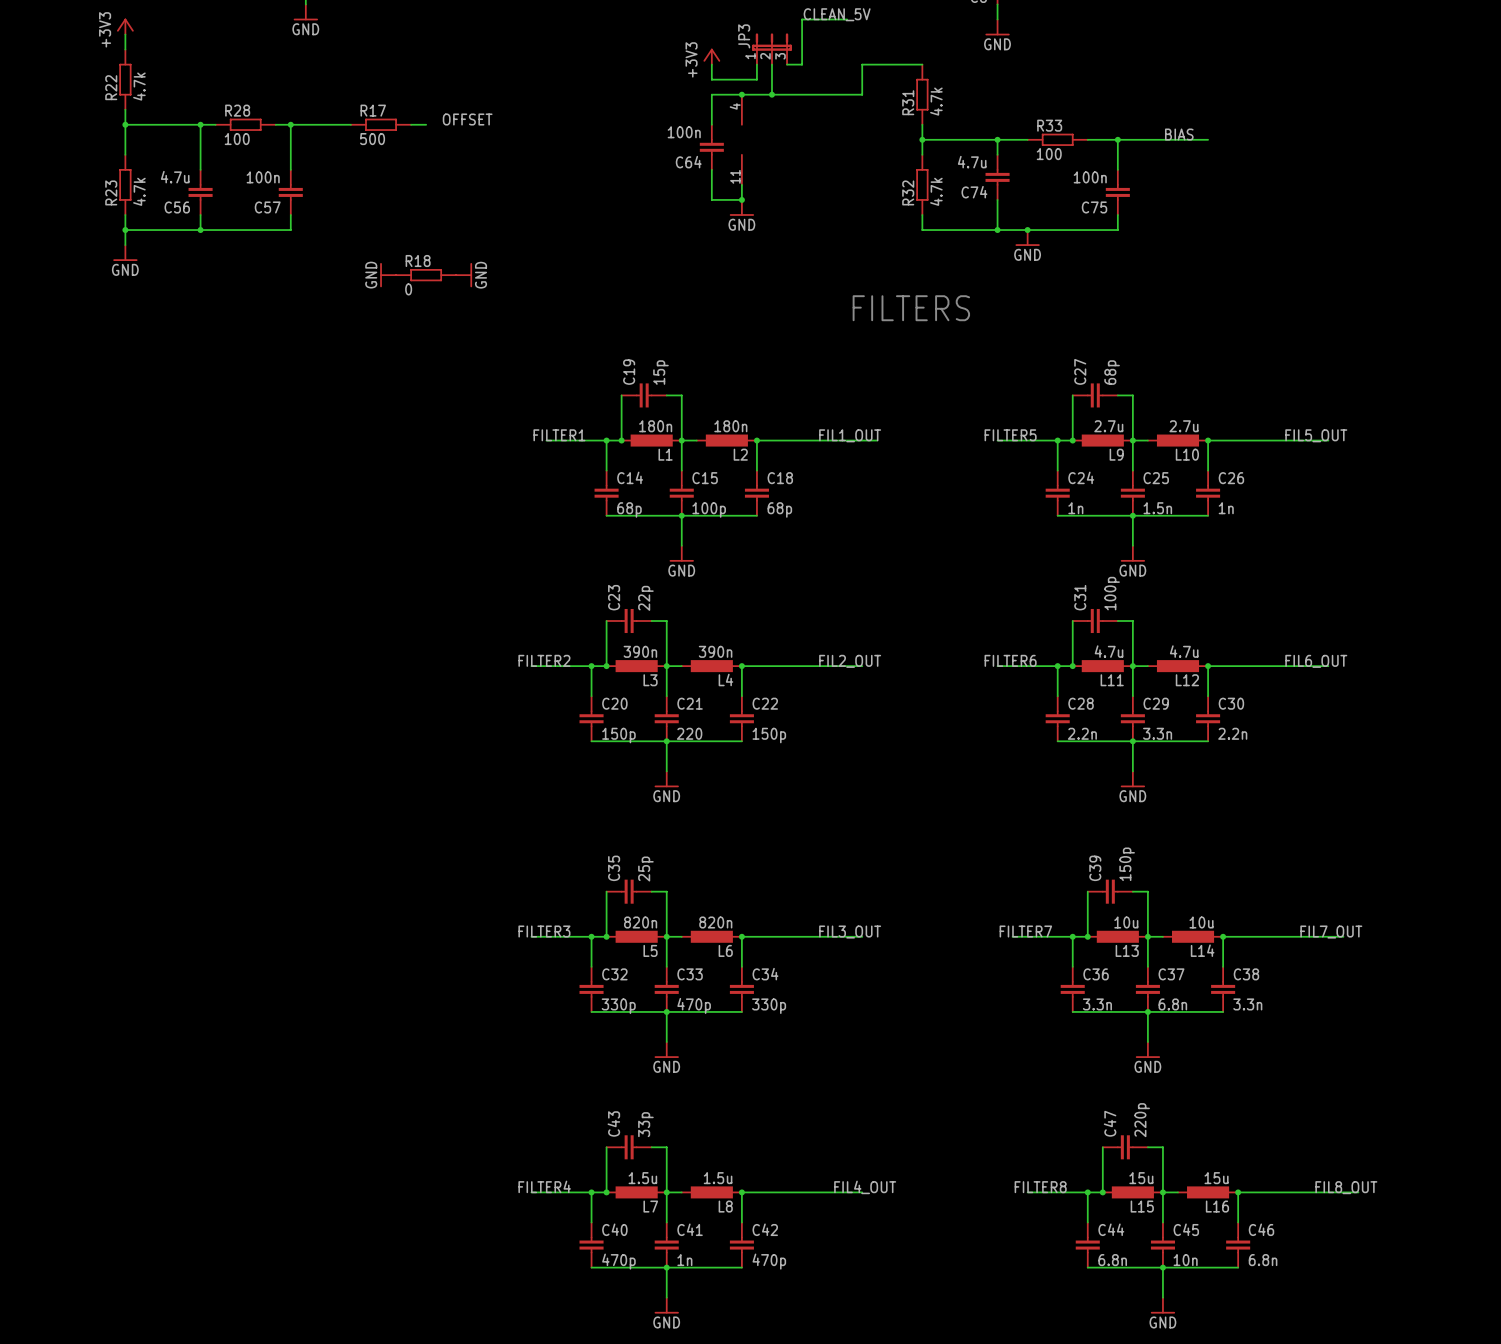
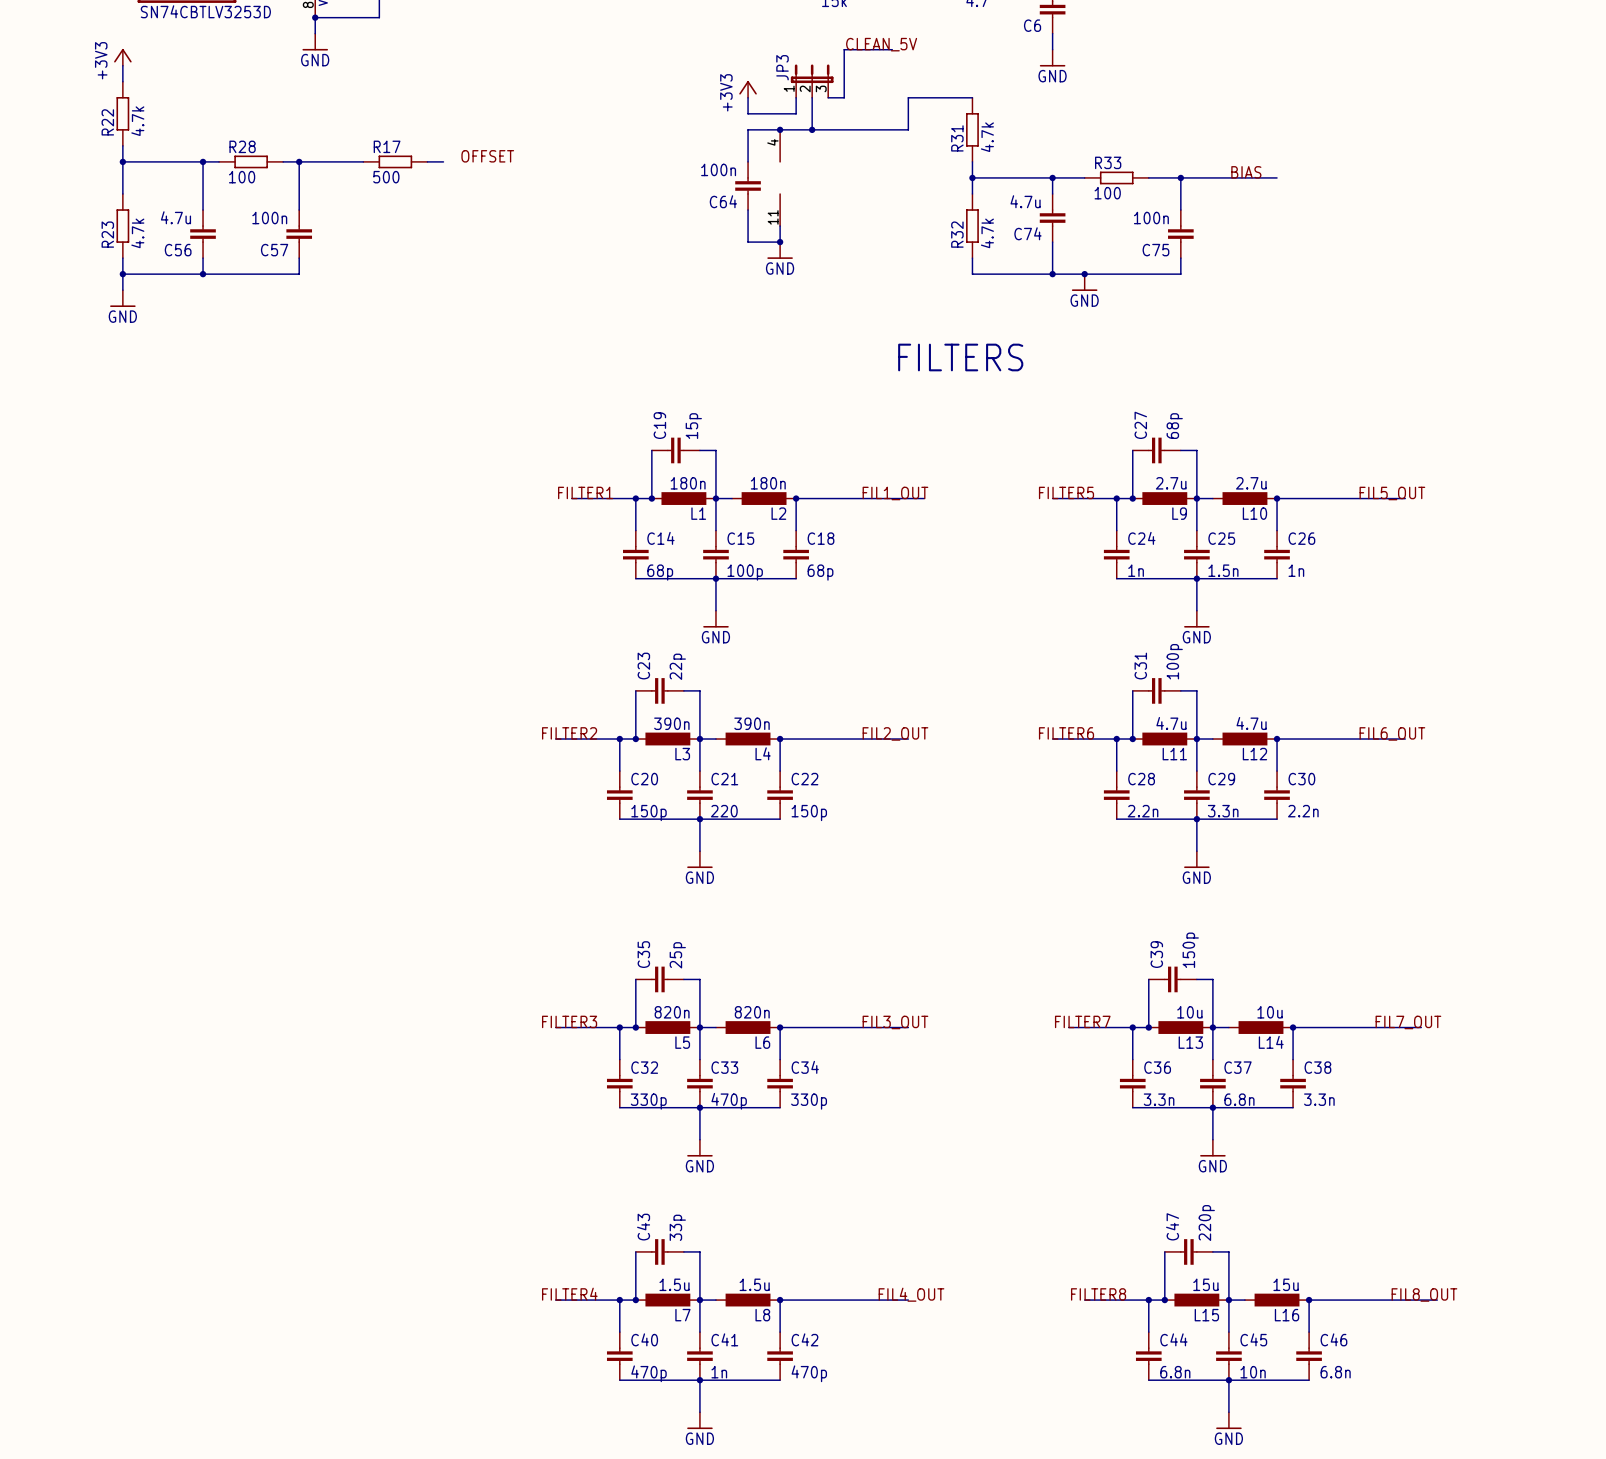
power symbol: GND (388, 275) -> none
R18: 0 (426, 275) -> none
power symbol: GND (464, 275) -> none

